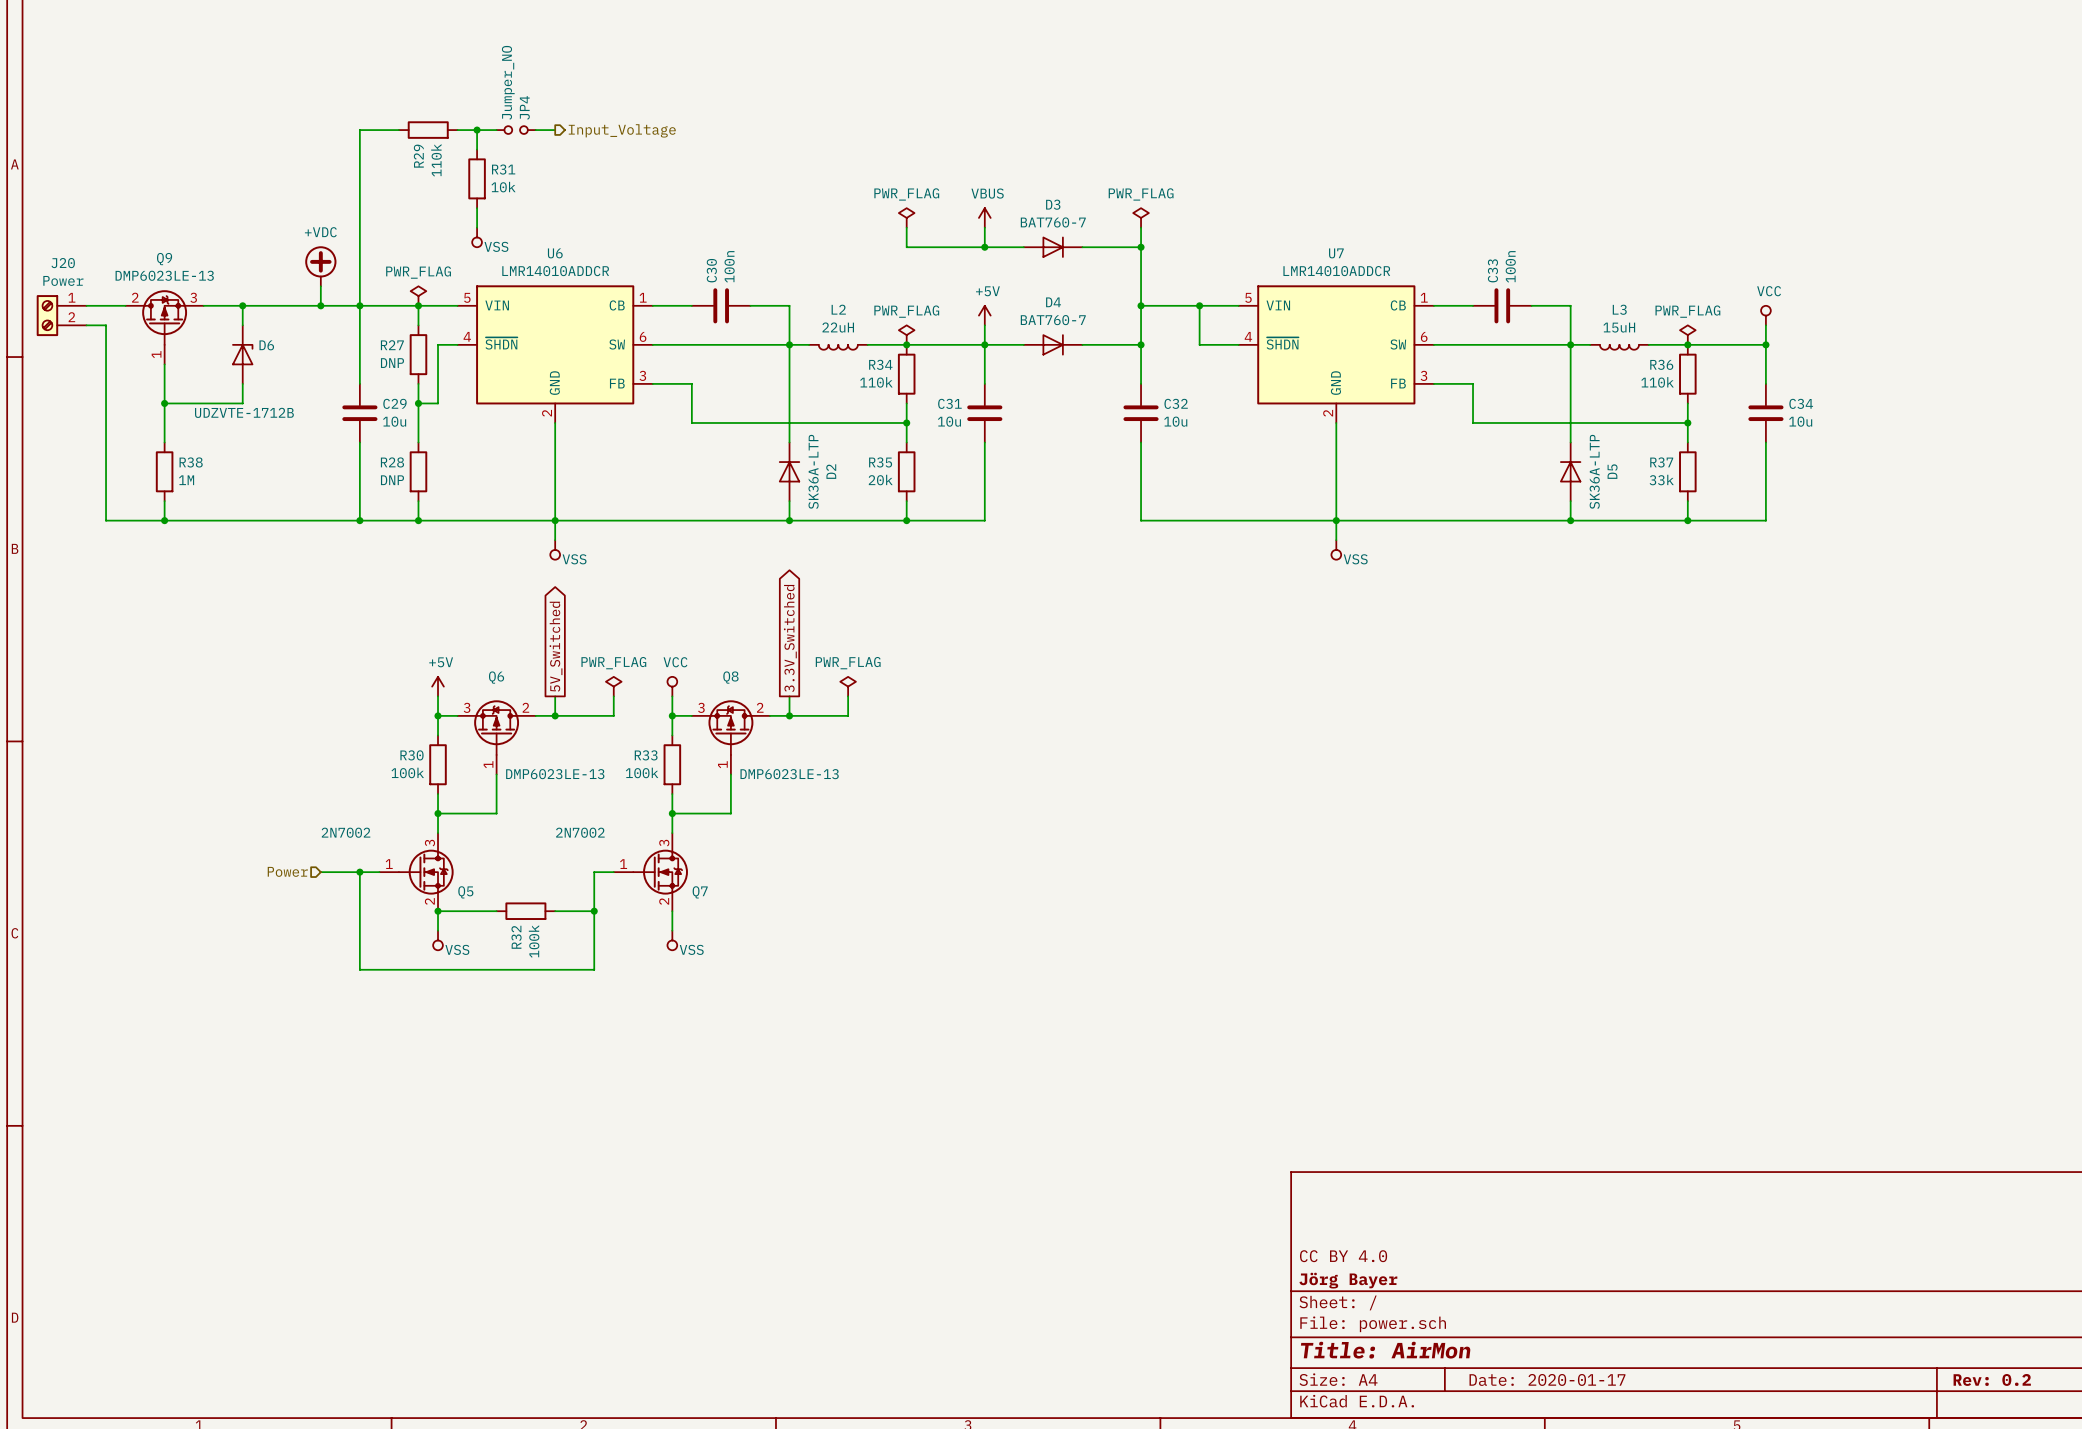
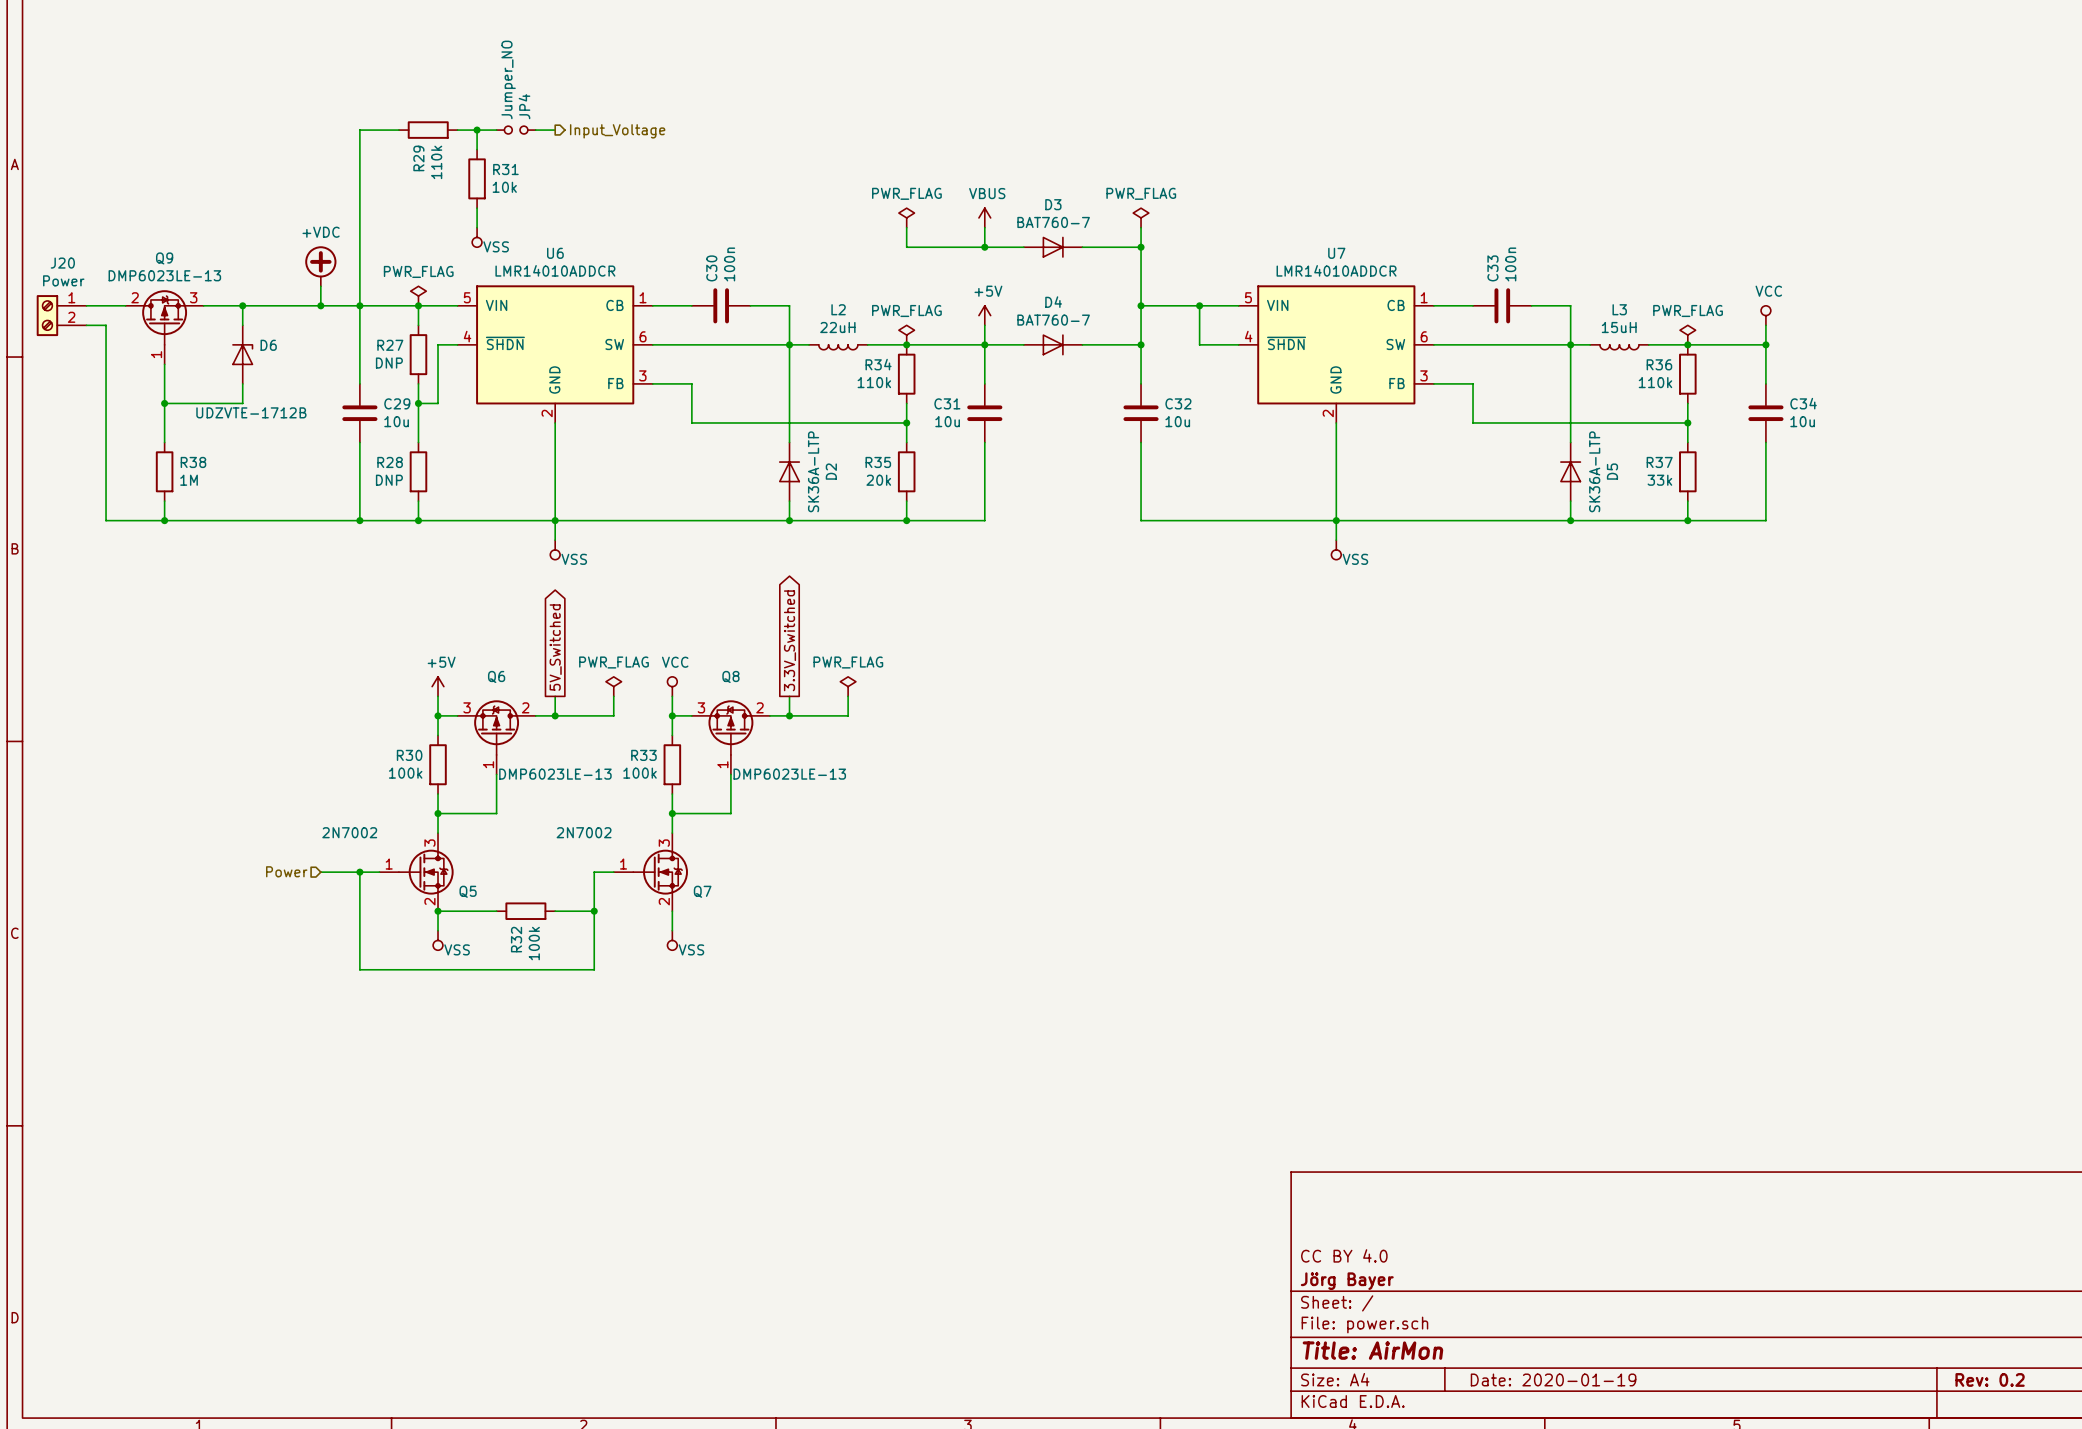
title block: Date: 2020-01-17 (1547, 1379) -> Date: 2020-01-19 (1553, 1379)

